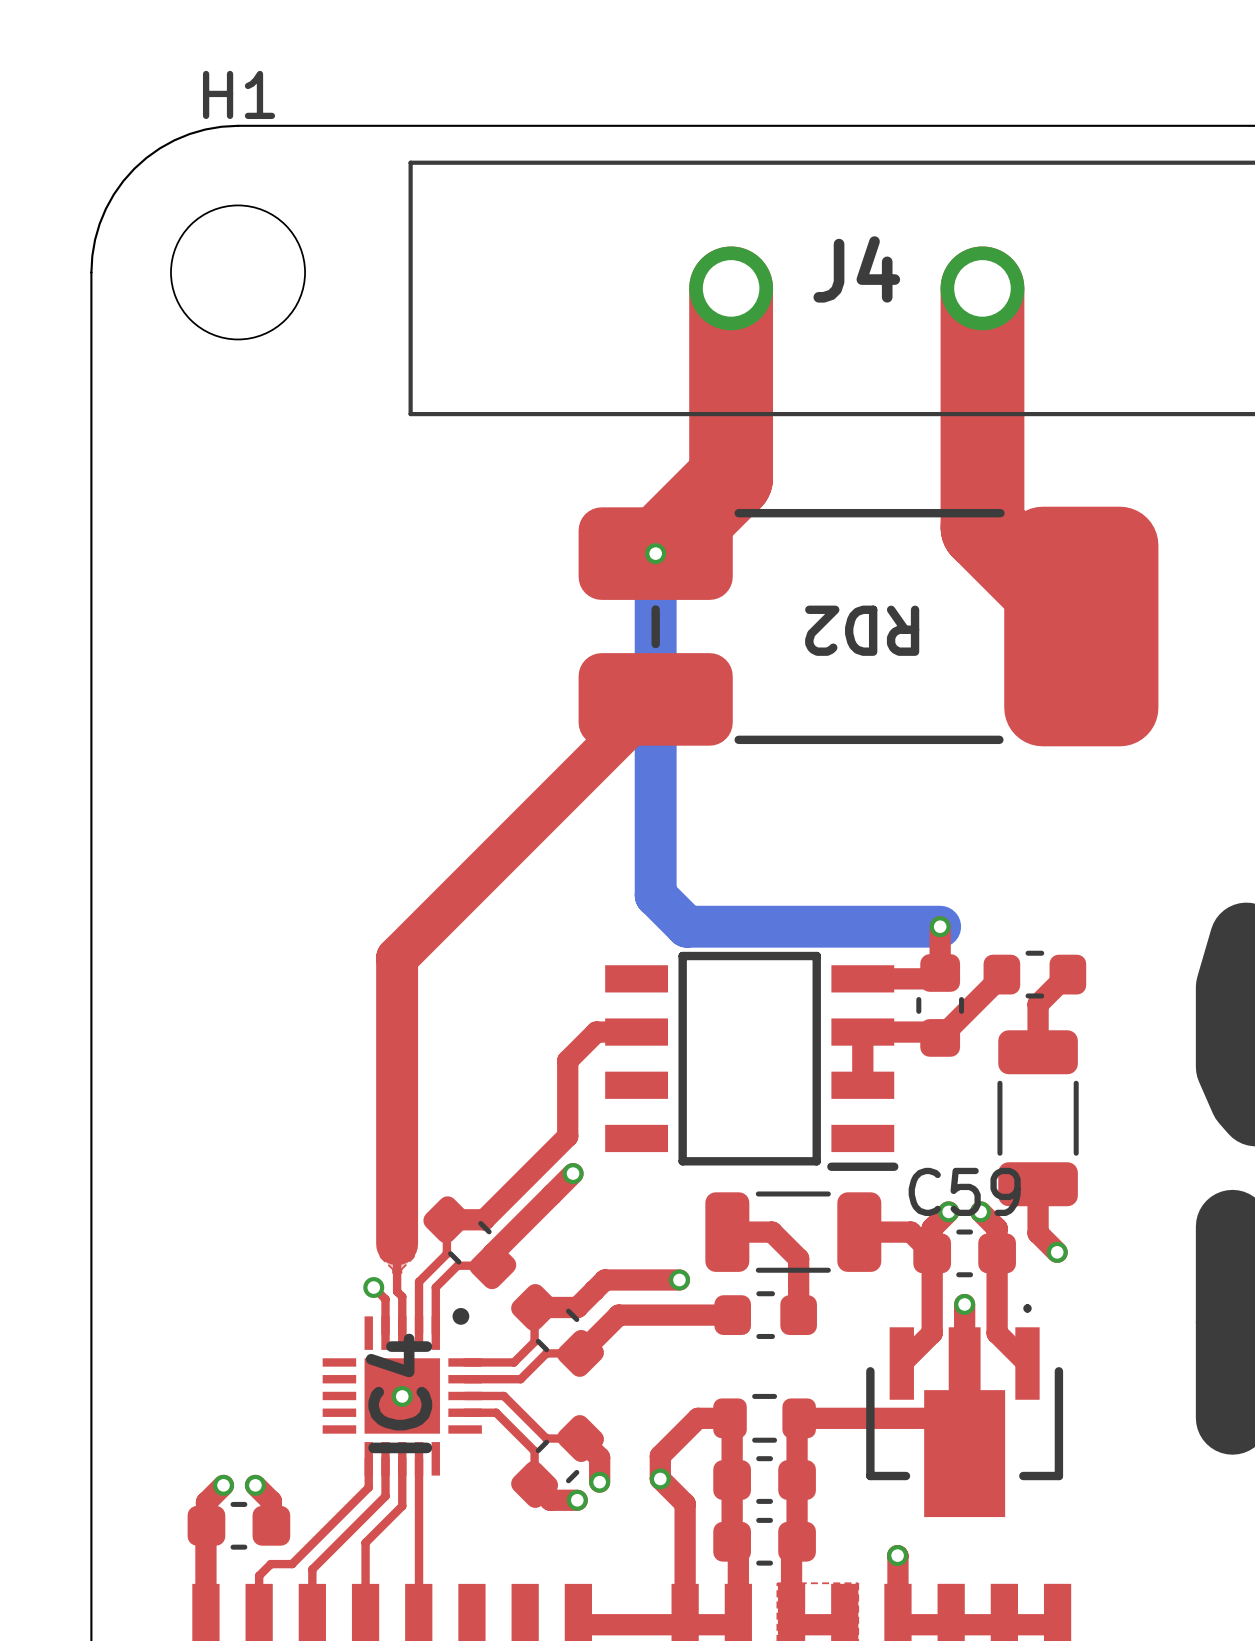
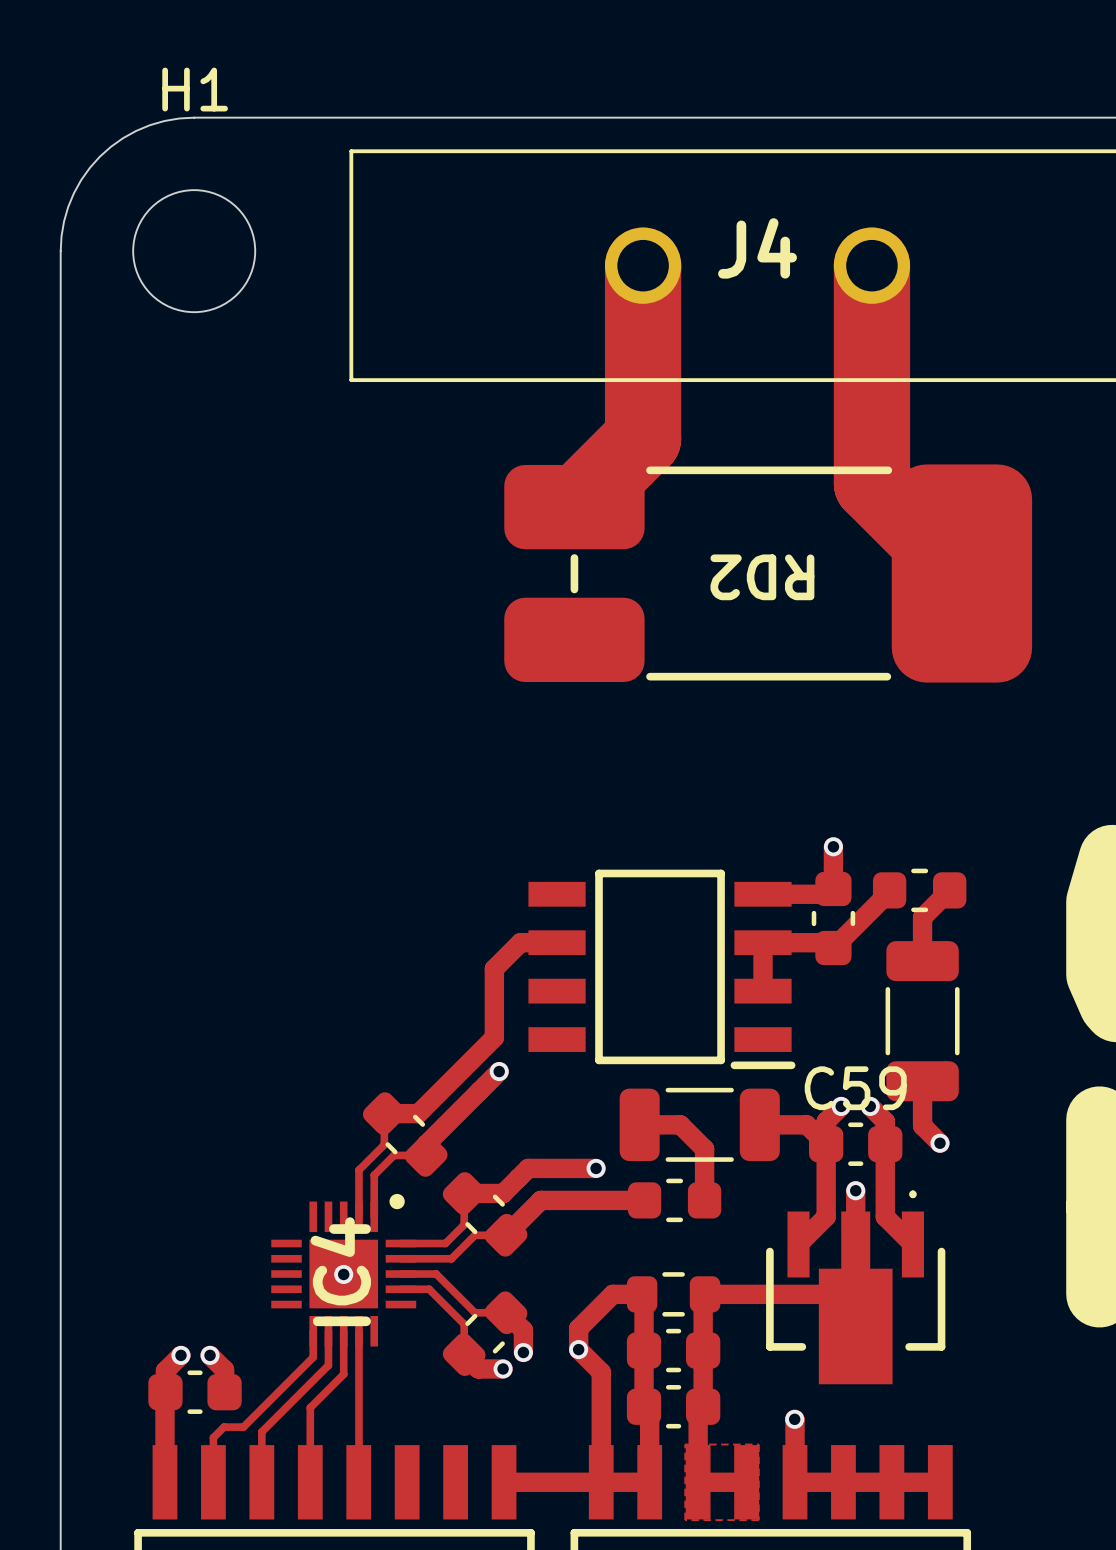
bottom track: (655, 553) (655, 895) (687, 926) (940, 926) -> none
via: (655, 553) -> none
top track: (655, 699) (397, 957) (397, 1291) (402, 1296) (402, 1333) -> none
top zone outline: (380, 1252) (413, 1252) (413, 1256) (401, 1269) (401, 1273) (393, 1273) (393, 1269) (380, 1256) (380, 1252) -> none
top track: (373, 1287) (385, 1299) (385, 1333) -> none
via: (373, 1287) -> none

